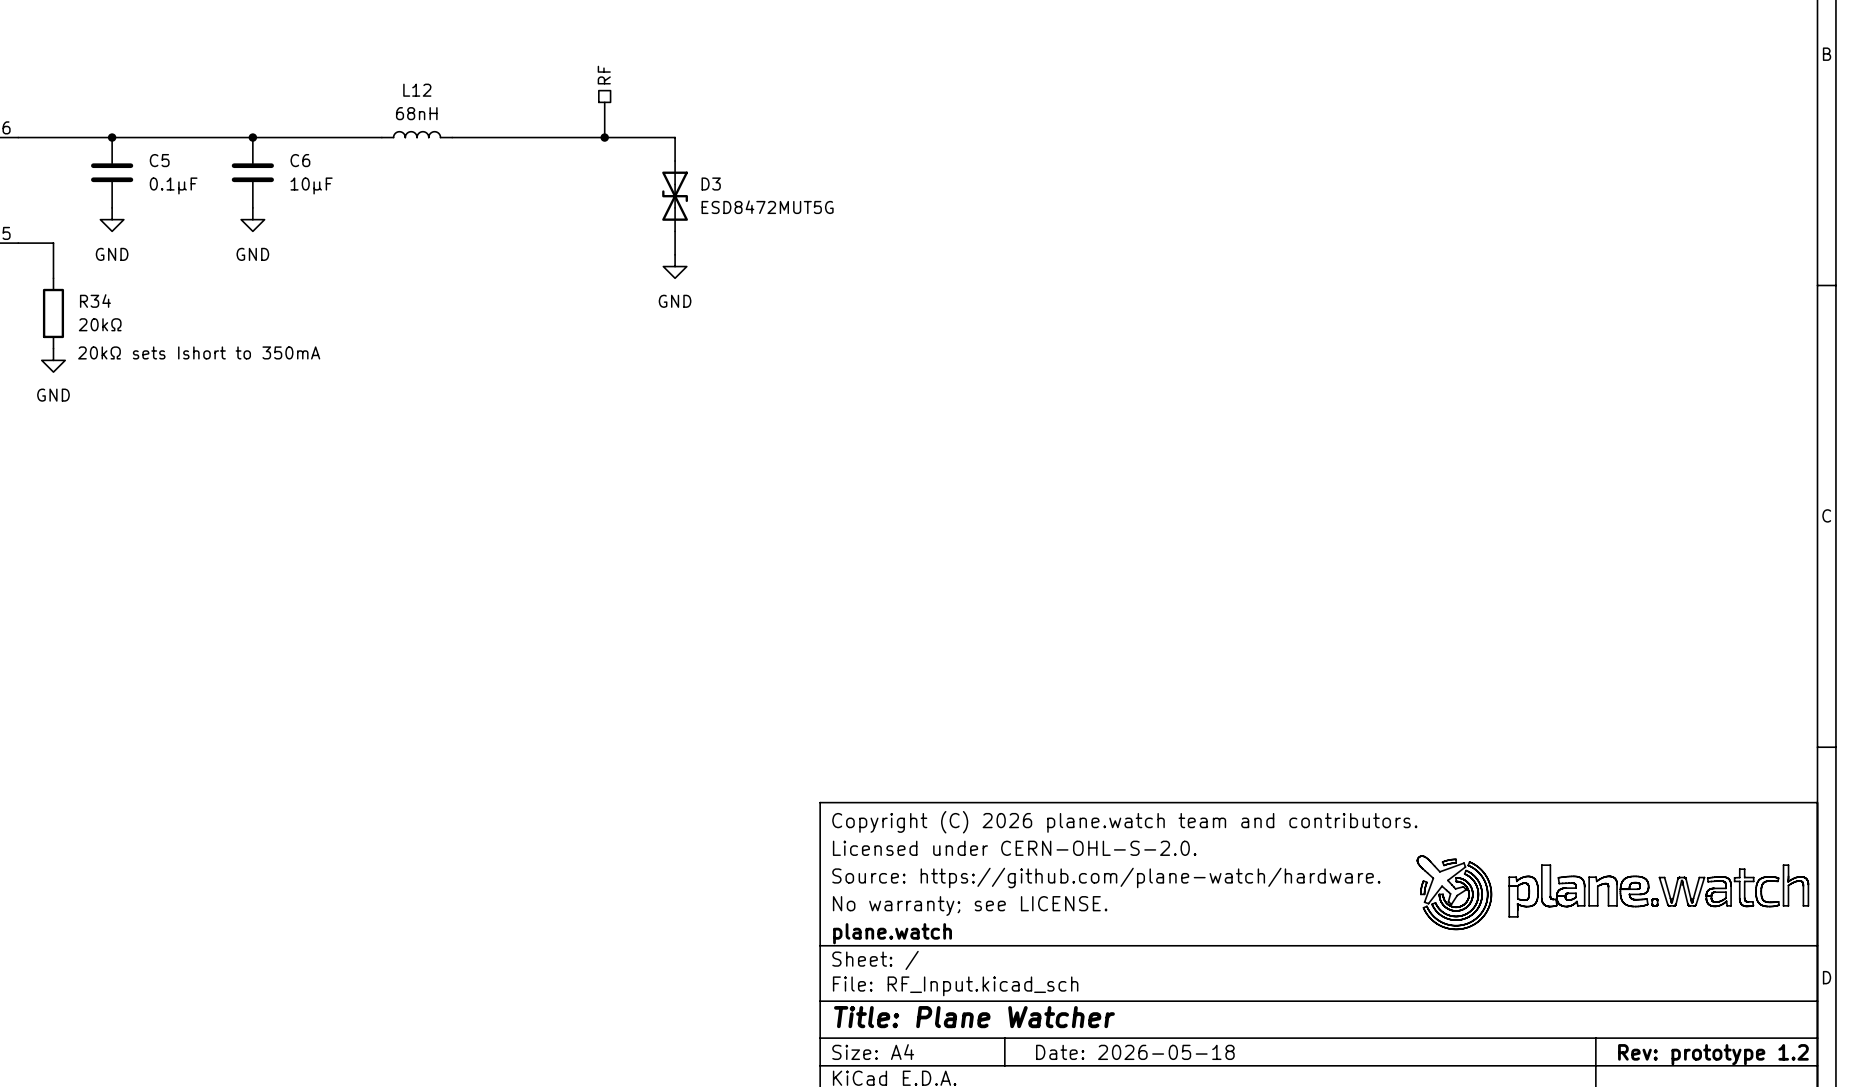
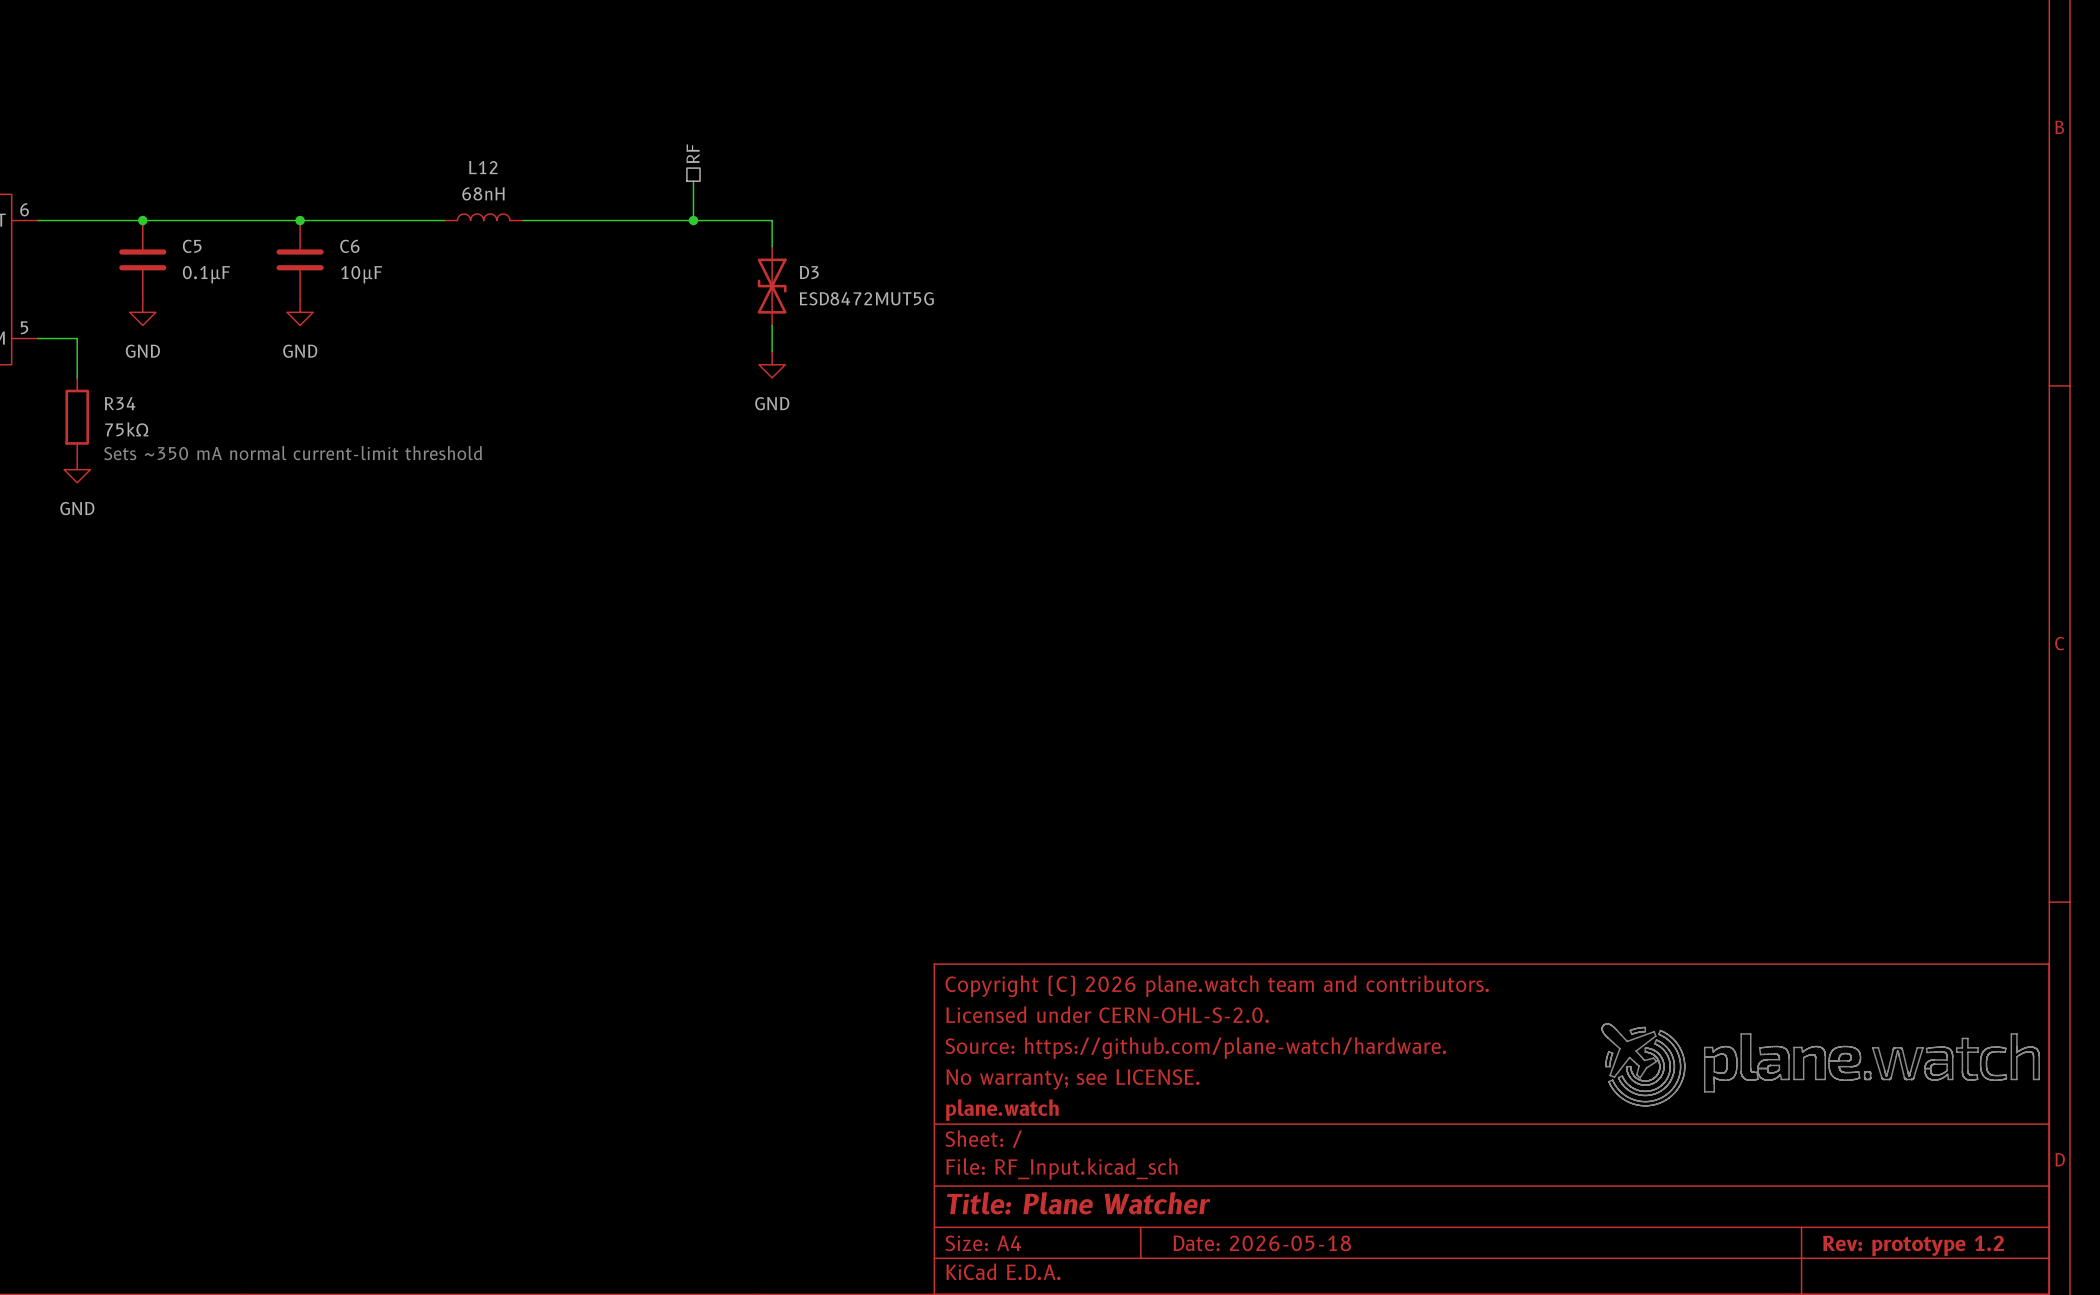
R34 value: 20kΩ (100, 324) -> 75kΩ (126, 429)
text: none -> Sets ~350 mA normal current-limit threshold (293, 453)
text: 20kΩ sets Ishort to 350mA (199, 352) -> none

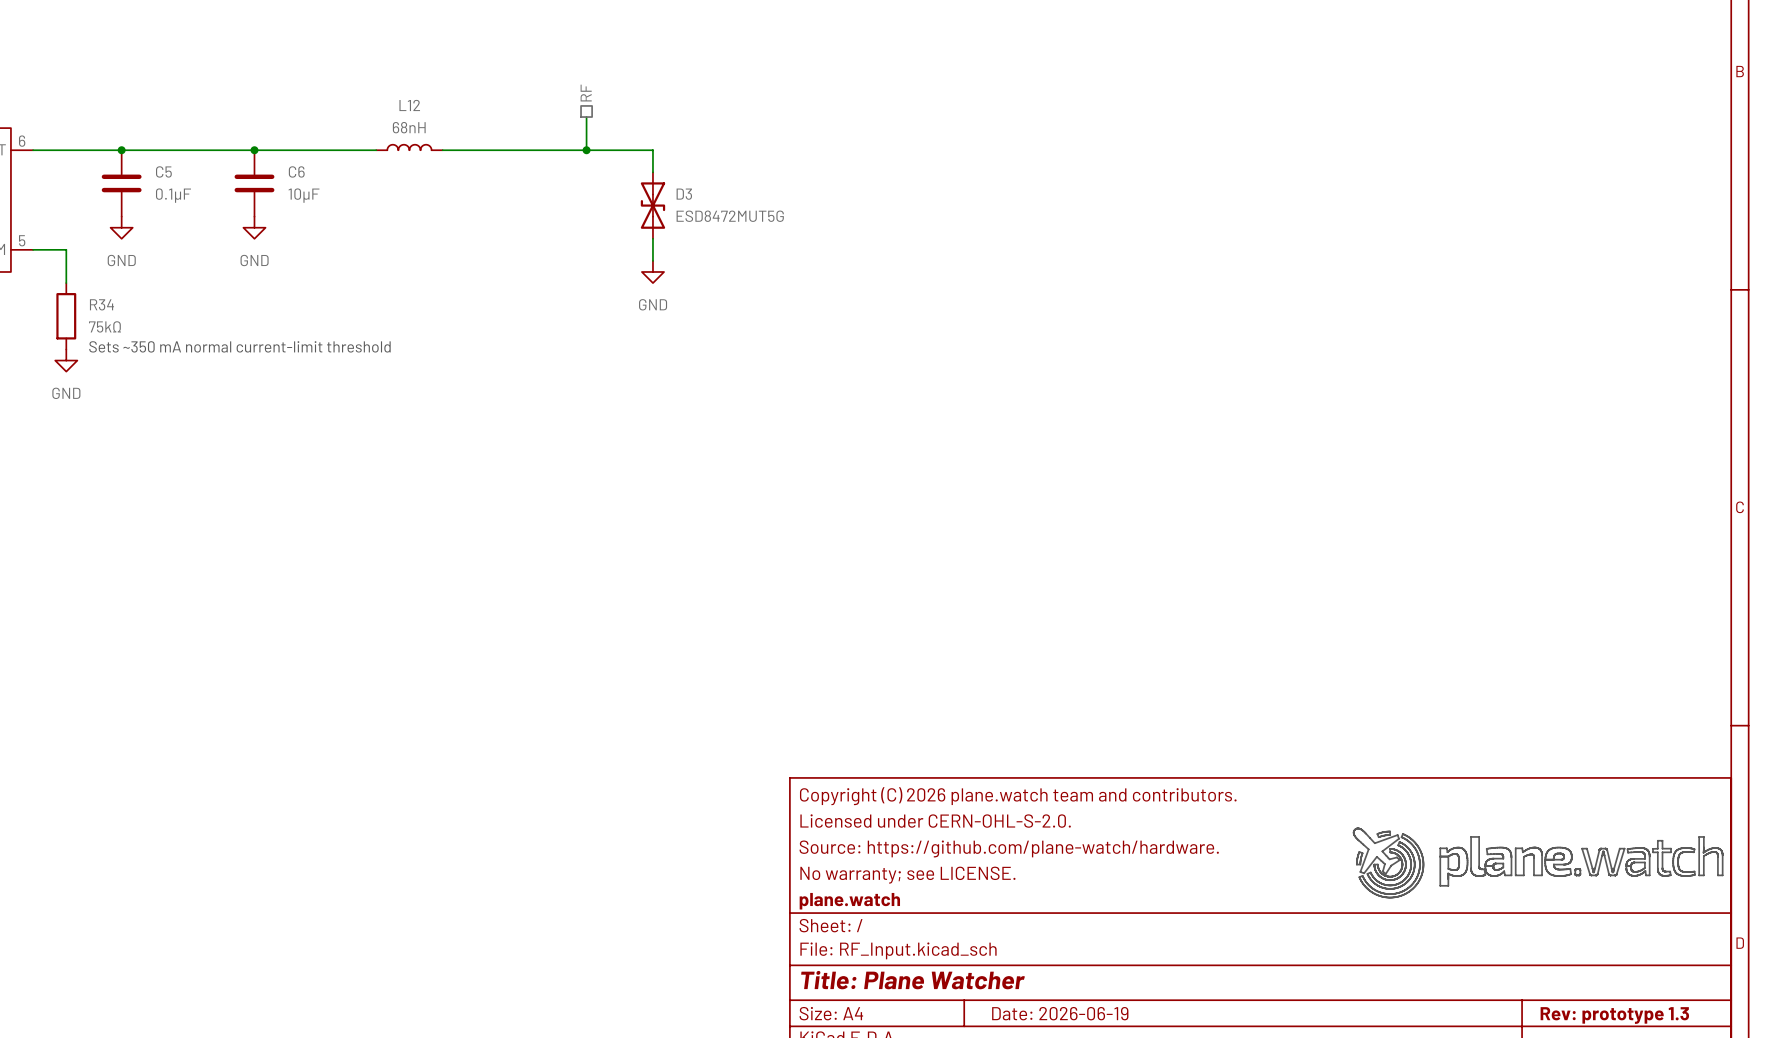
title block: Date: 2026-05-18 (1262, 1243) -> Date: 2026-06-19 (1060, 1013)
title block: Rev: prototype 1.2 (1913, 1245) -> Rev: prototype 1.3 (1614, 1015)

